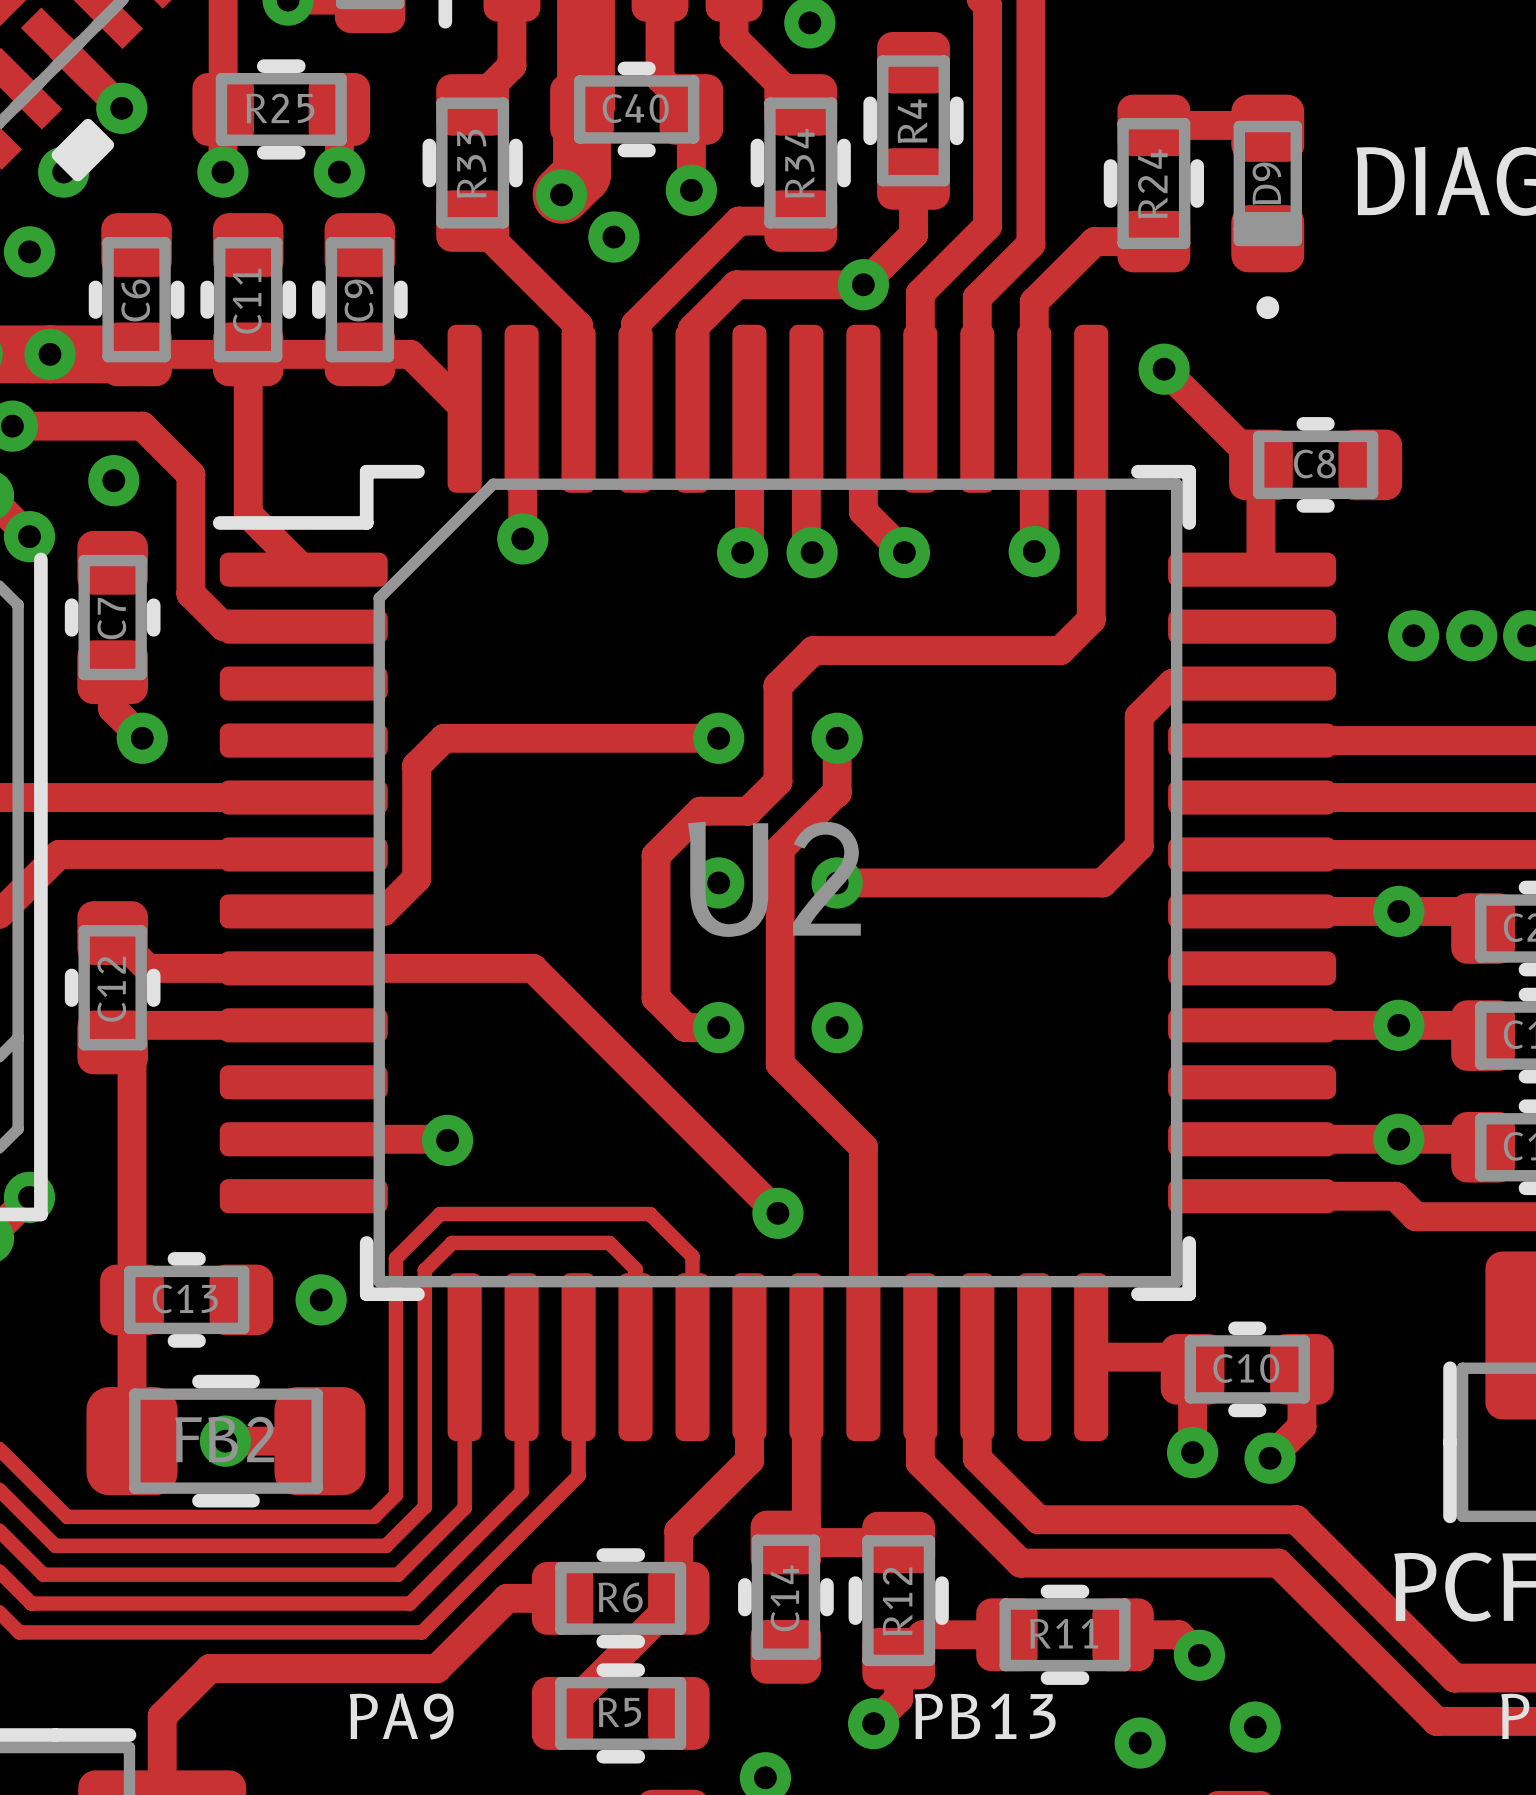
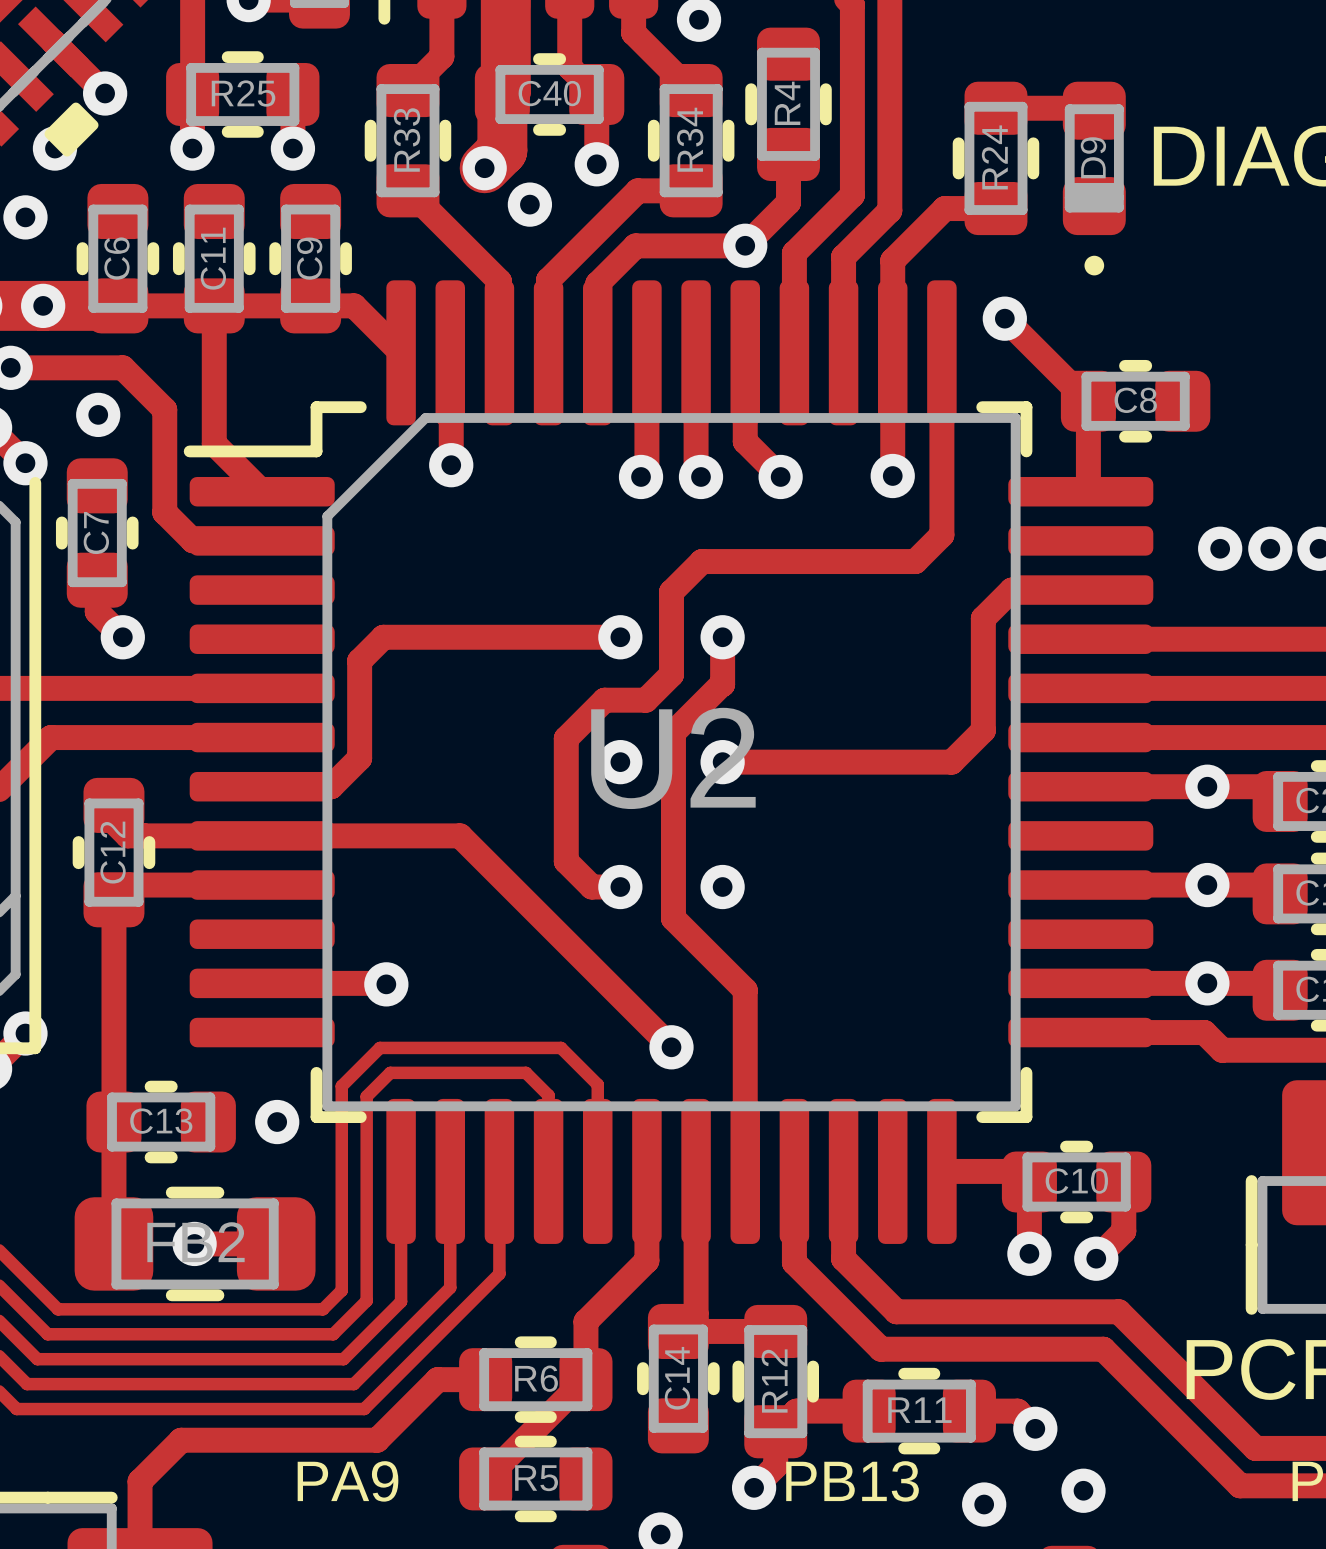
C12 position: (112, 987) -> (113, 852)

